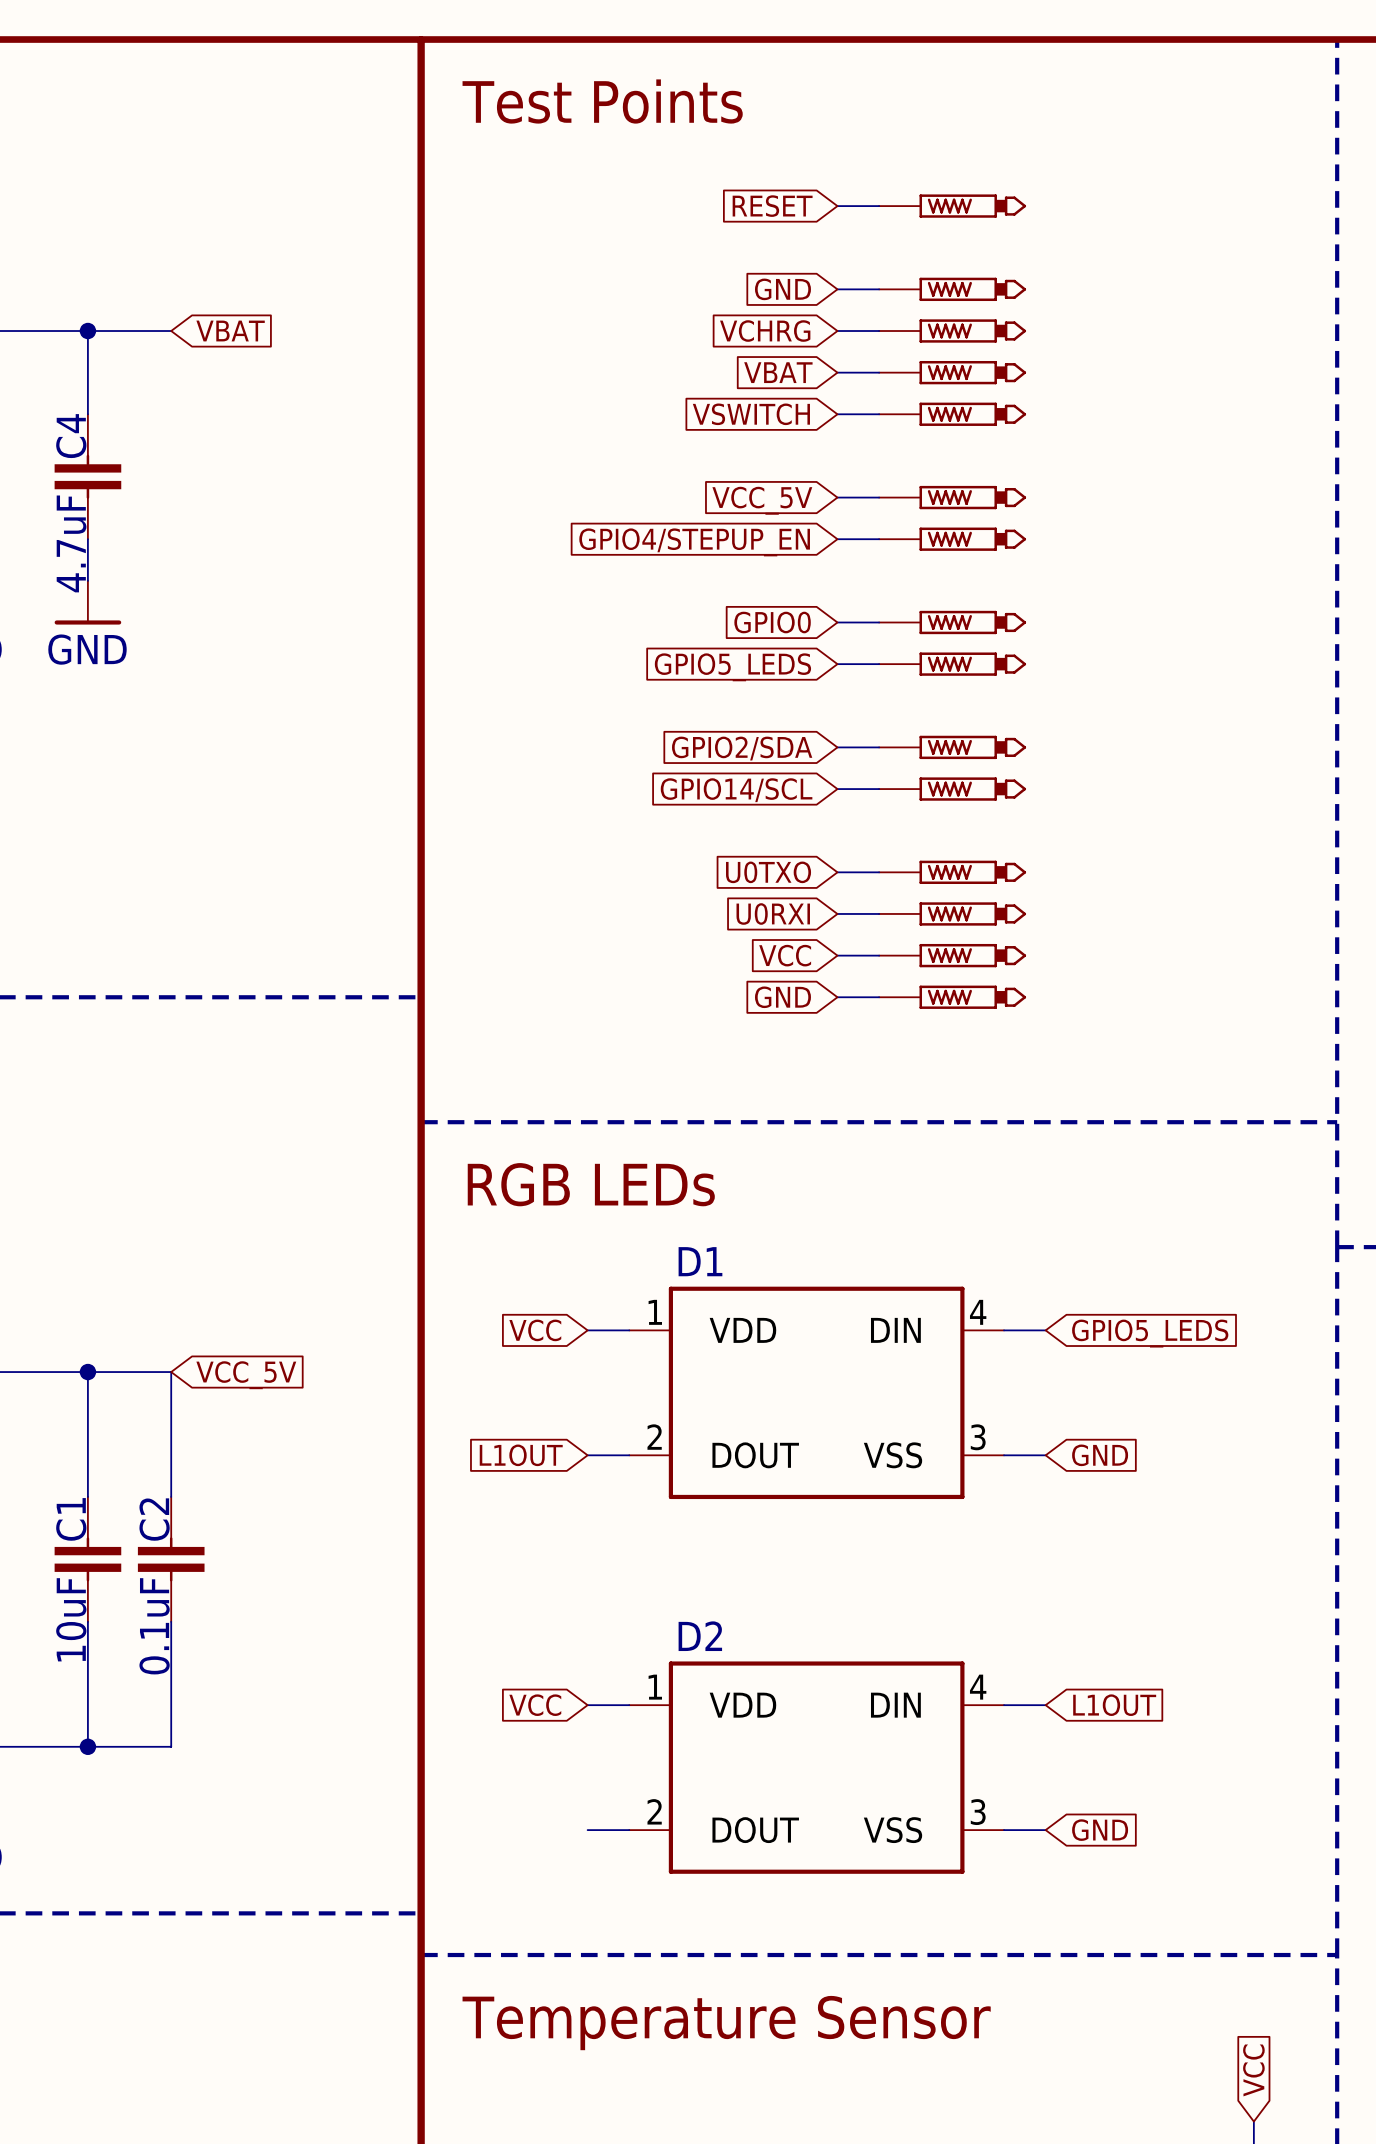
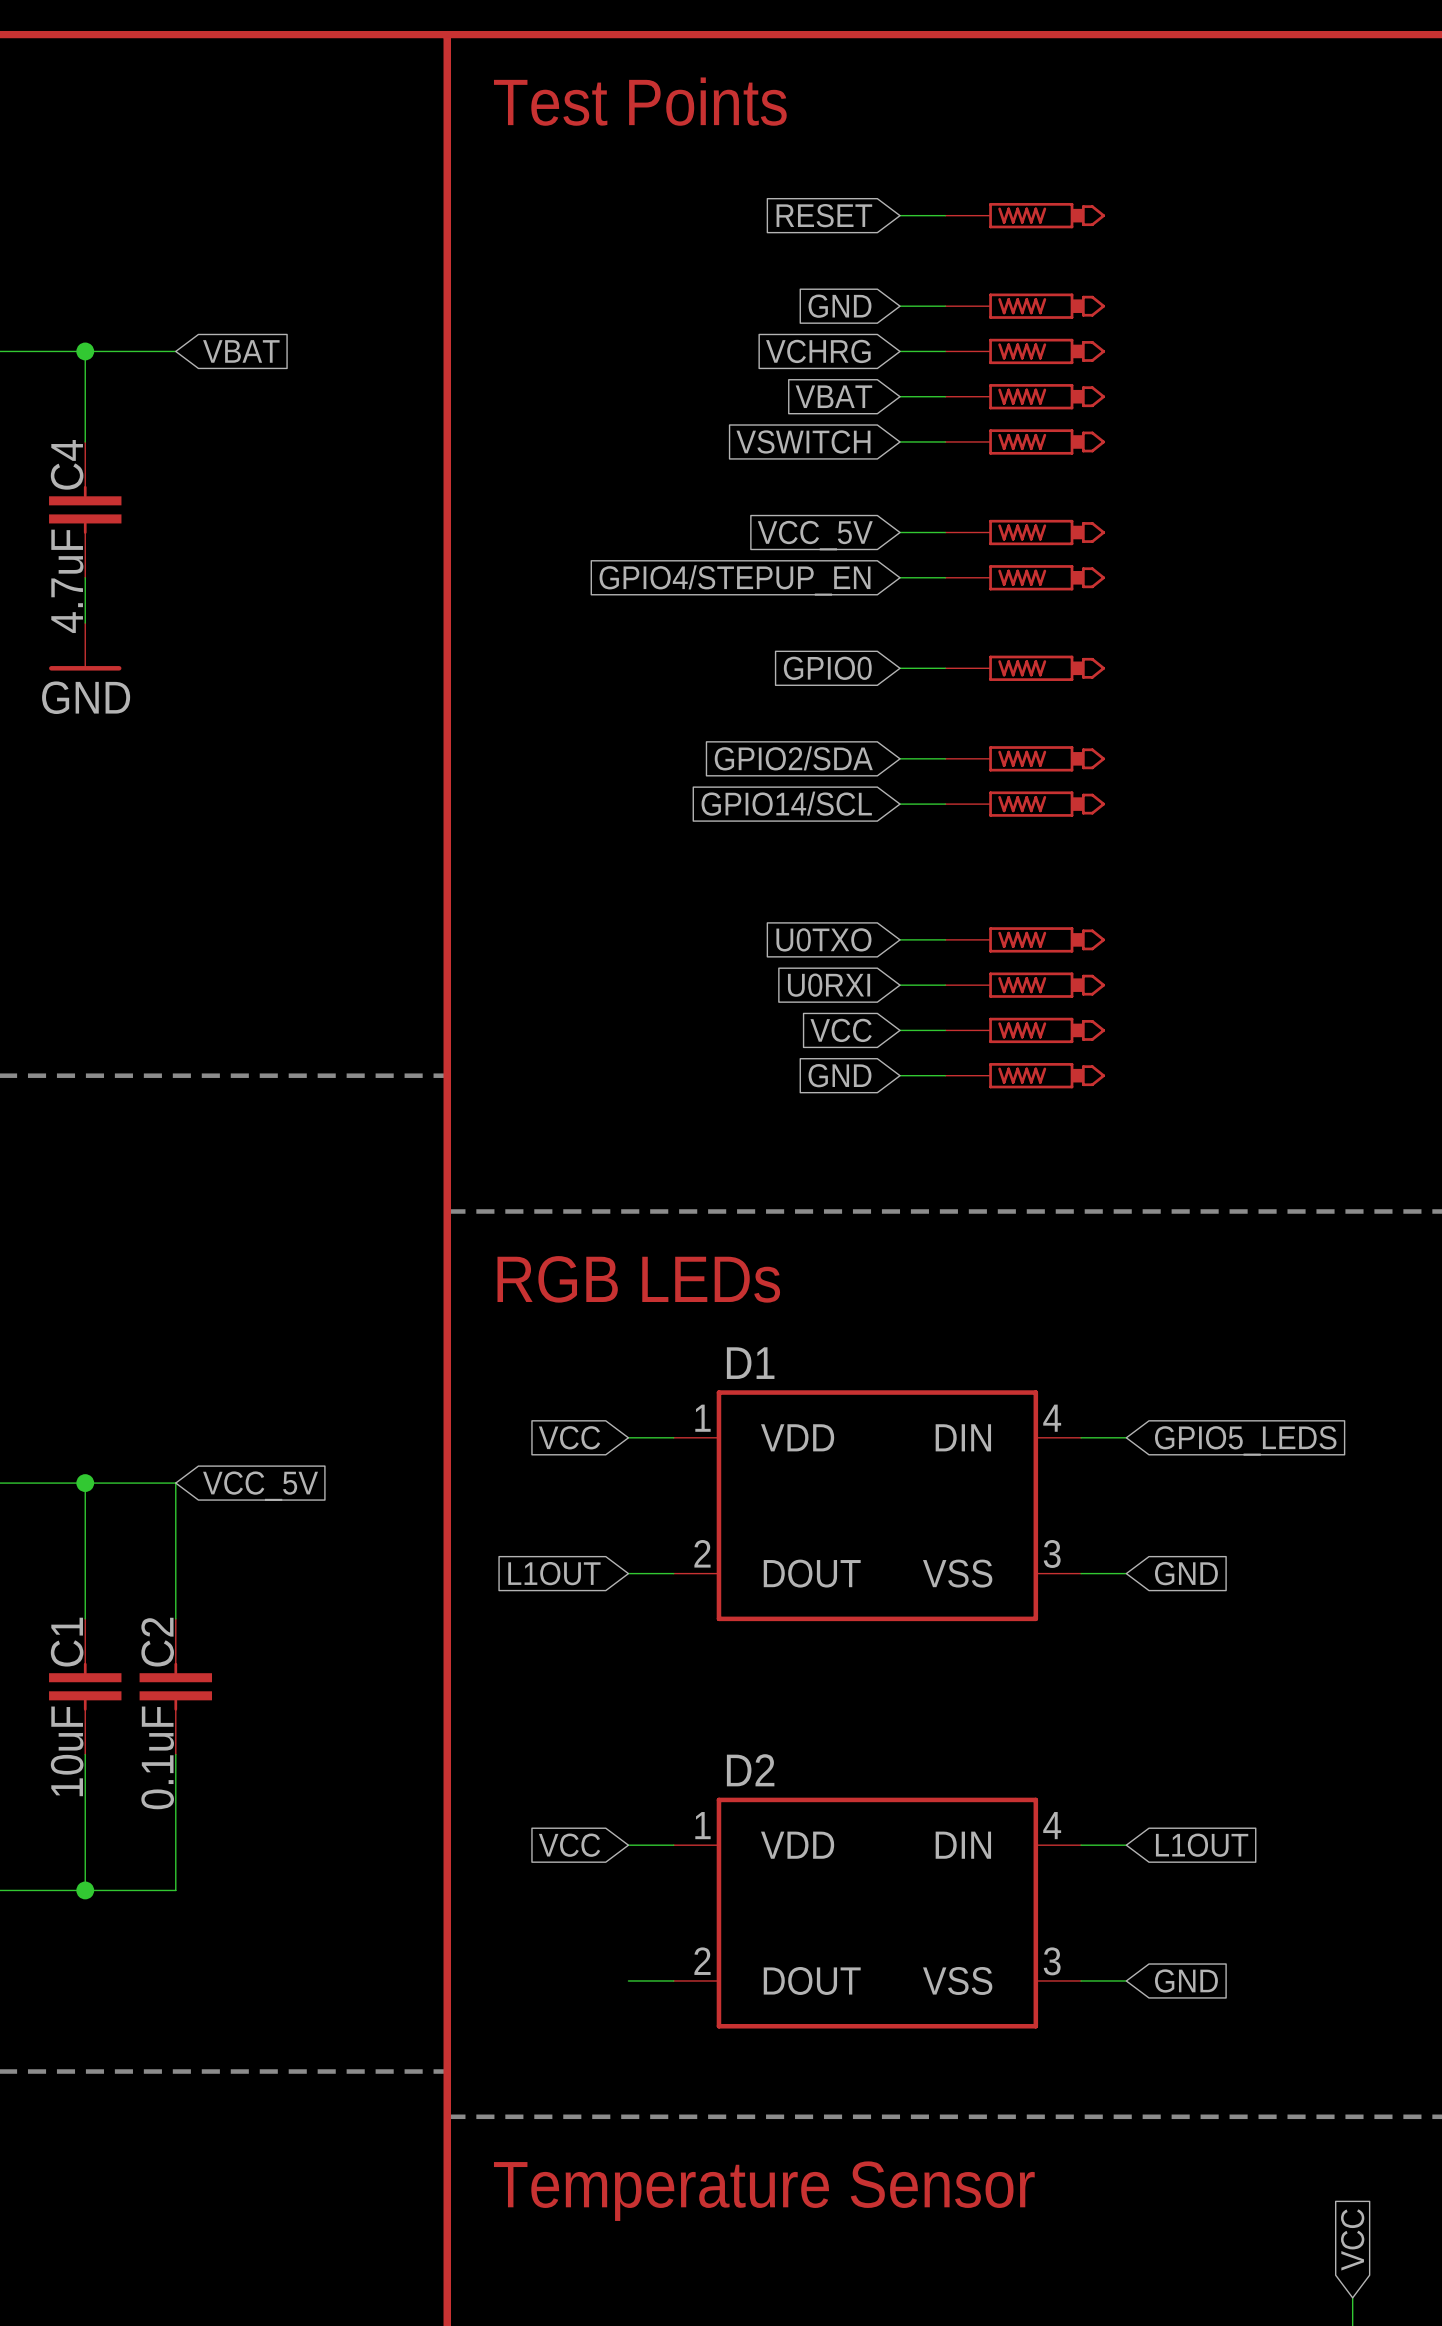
wire: (837, 664) (879, 664) -> (900, 758) (945, 758)
part: (952, 664) -> none
global label: GPIO5_LEDS (732, 667) -> none
part: none -> (1025, 758)
global label: none -> GPIO2/SDA (793, 758)
global label: GPIO2/SDA (742, 748) -> GPIO14/SCL (786, 803)
wire: (837, 789) (879, 789) -> none
part: (952, 789) -> none
global label: GPIO14/SCL (736, 790) -> none

